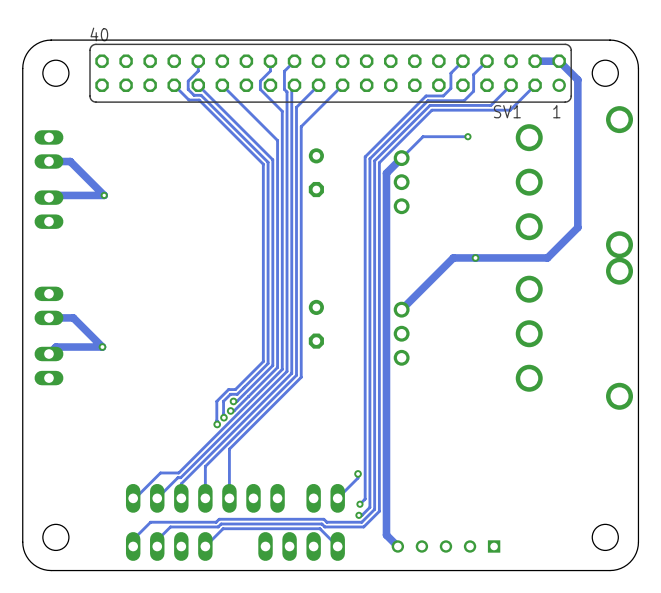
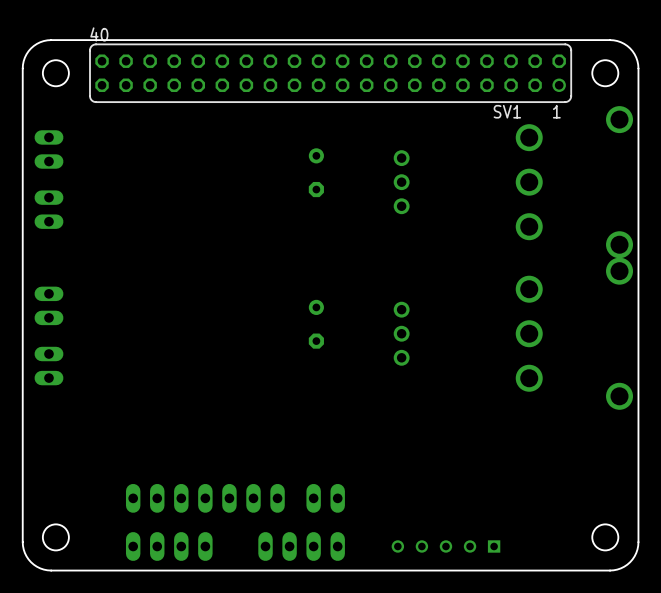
track: (198, 61) (198, 71) (188, 81) (188, 89) (194, 95) (201, 95) (268, 162) (268, 363) (237, 394) (230, 394) (223, 401) (223, 417) -> none
track: (270, 61) (270, 71) (260, 81) (260, 89) (282, 111) (282, 369) (178, 472) (160, 472) (133, 498) -> none
track: (294, 61) (284, 71) (284, 89) (287, 92) (287, 371) (180, 477) (177, 477) (157, 498) -> none
track: (462, 61) (450, 73) (450, 88) (443, 95) (426, 95) (365, 156) (365, 499) (359, 504) -> none
track: (486, 61) (473, 74) (473, 91) (464, 100) (428, 100) (369, 158) (369, 507) (361, 515) (358, 515) -> none
track: (535, 61) (559, 61) (577, 79) (577, 227) (547, 257) (453, 257) (401, 309) -> none
track: (174, 85) (188, 100) (199, 100) (263, 164) (263, 361) (235, 389) (228, 389) (216, 401) (217, 424) -> none
track: (198, 85) (272, 159) (272, 365) (236, 401) (233, 401) -> none
track: (222, 85) (277, 140) (277, 367) (234, 410) (230, 410) -> none
track: (294, 85) (291, 88) (291, 373) (181, 483) (181, 498) -> none
track: (318, 85) (296, 107) (296, 375) (205, 466) (205, 498) -> none
track: (342, 85) (301, 126) (301, 377) (229, 449) (229, 498) -> none
track: (511, 85) (490, 105) (429, 105) (374, 160) (374, 509) (361, 522) (326, 522) (323, 519) (219, 519) (216, 522) (150, 522) (133, 539) (133, 546) -> none
track: (535, 85) (510, 110) (431, 110) (379, 162) (379, 511) (363, 526) (324, 526) (321, 524) (221, 524) (218, 526) (170, 526) (157, 540) (157, 546) -> none
track: (467, 136) (423, 136) (386, 173) (386, 535) (397, 546) -> none
via: (467, 136) -> none
track: (48, 161) (70, 161) (104, 195) (51, 195) (48, 197) -> none
via: (104, 195) -> none
via: (475, 257) -> none
track: (48, 317) (73, 317) (102, 347) (55, 347) (48, 354) -> none
via: (102, 347) -> none
via: (233, 401) -> none
via: (230, 410) -> none
via: (223, 417) -> none
via: (217, 424) -> none
track: (358, 473) (358, 478) (337, 498) -> none
via: (358, 473) -> none
via: (359, 504) -> none
via: (358, 515) -> none
track: (337, 546) (319, 528) (223, 528) (205, 546) -> none

